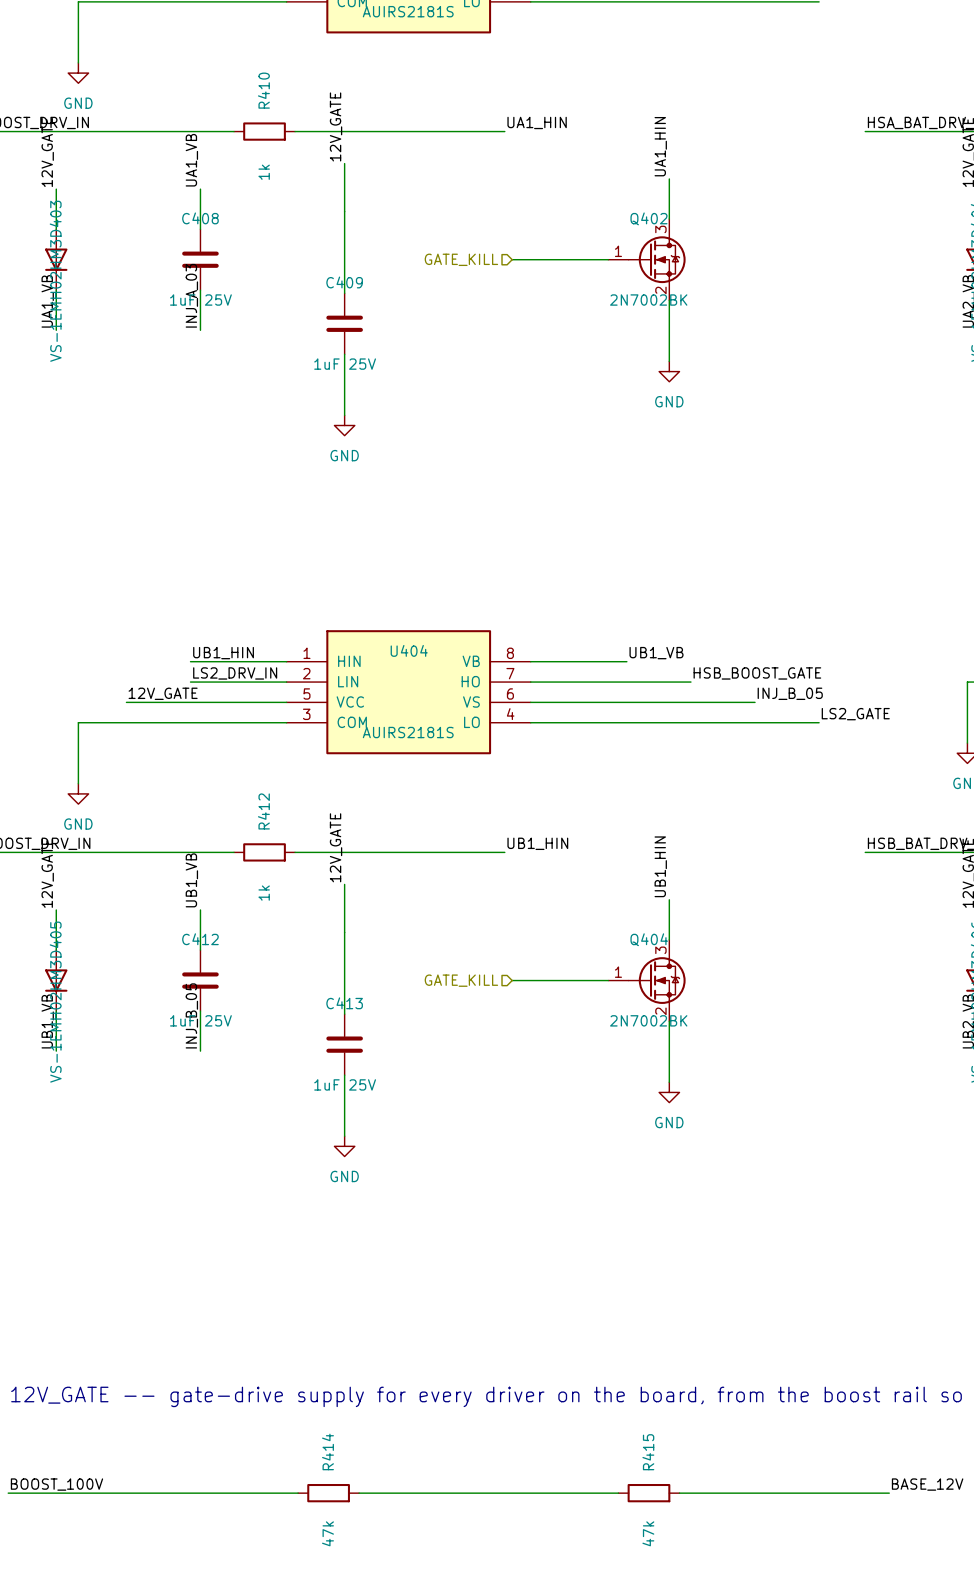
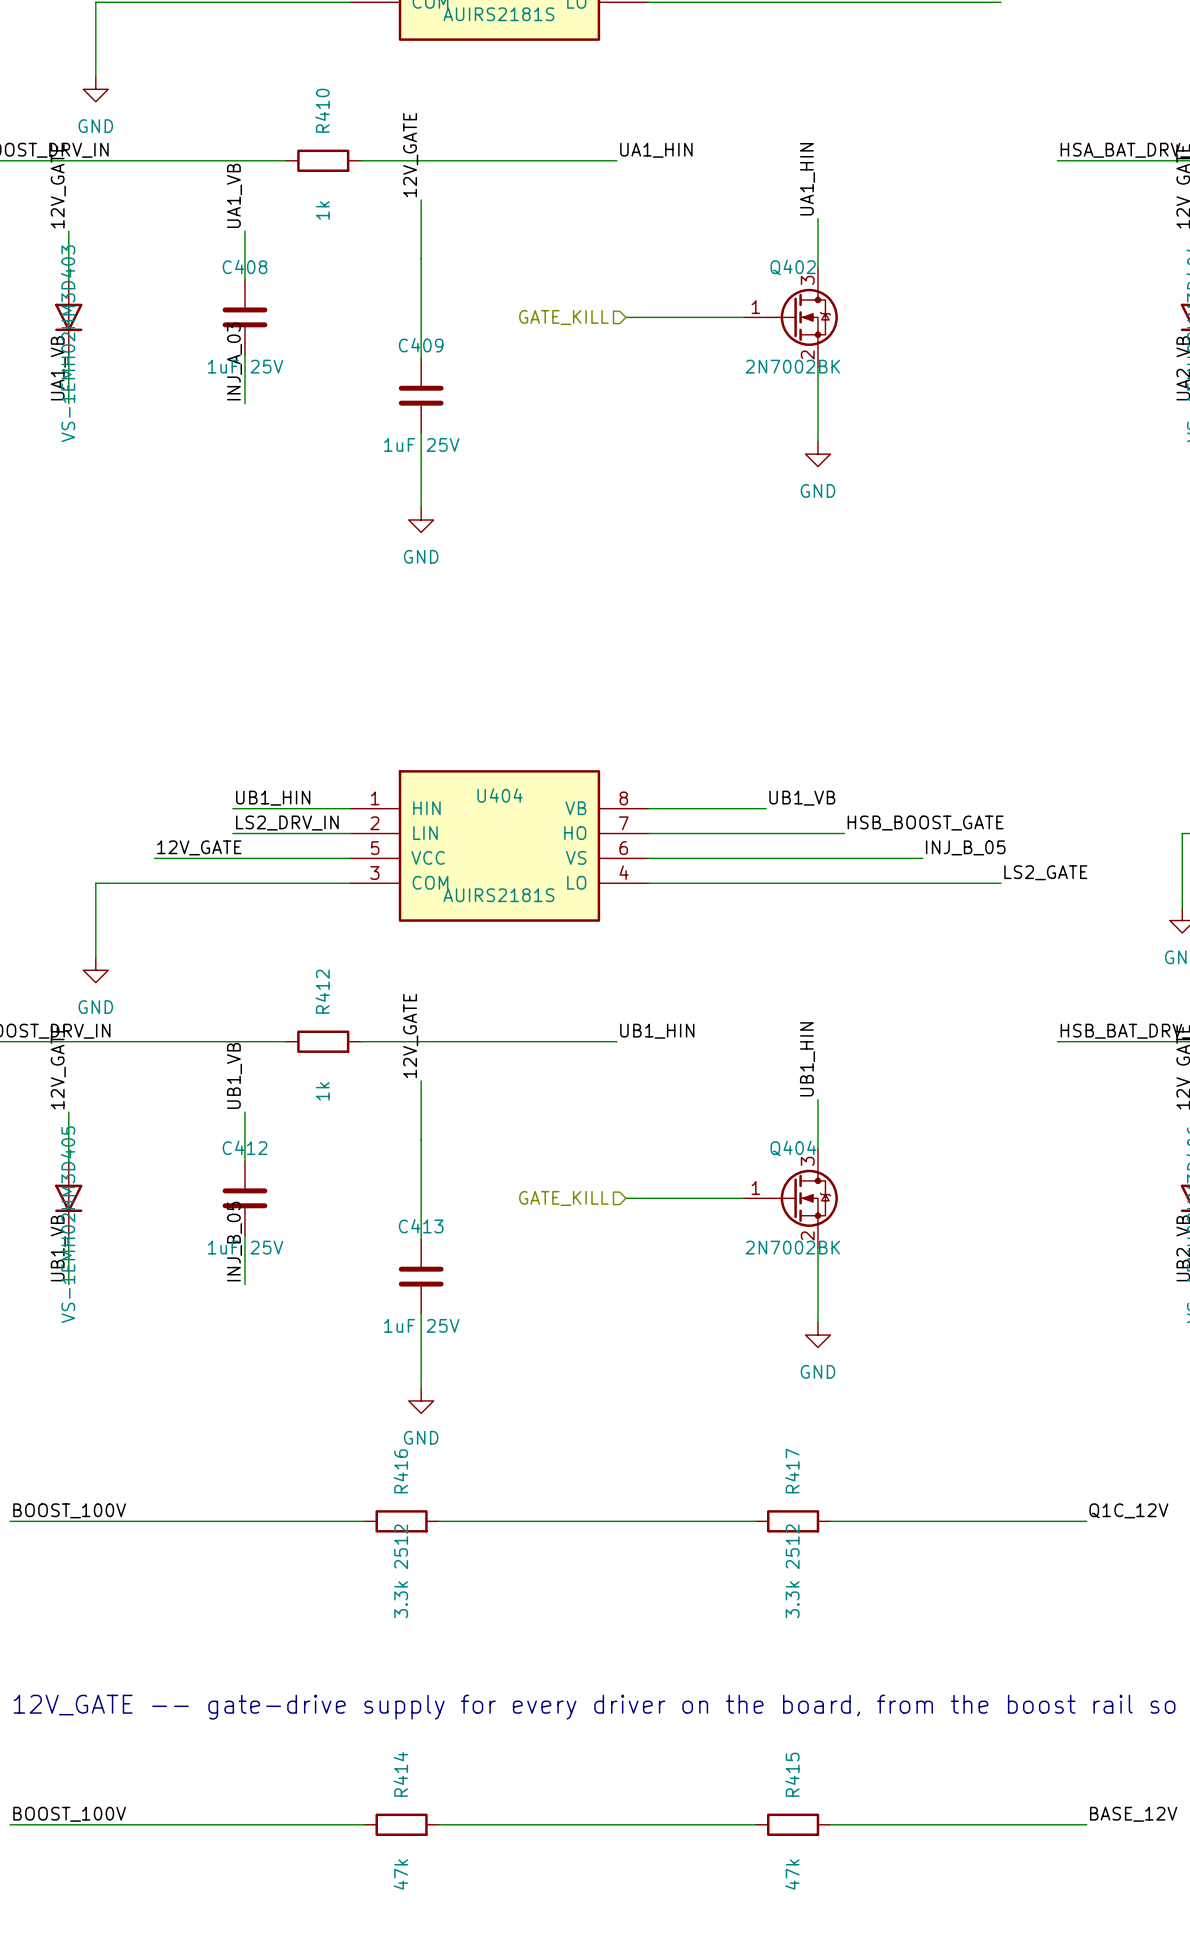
label: none -> BOOST_100V (69, 1510)
label: none -> Q1C_12V (1128, 1510)
wire: none -> (10, 1521) (364, 1521)
R416: none -> 3.3k 2512 (401, 1521)
wire: none -> (438, 1521) (755, 1521)
R417: none -> 3.3k 2512 (793, 1521)
wire: none -> (830, 1521) (1086, 1521)

